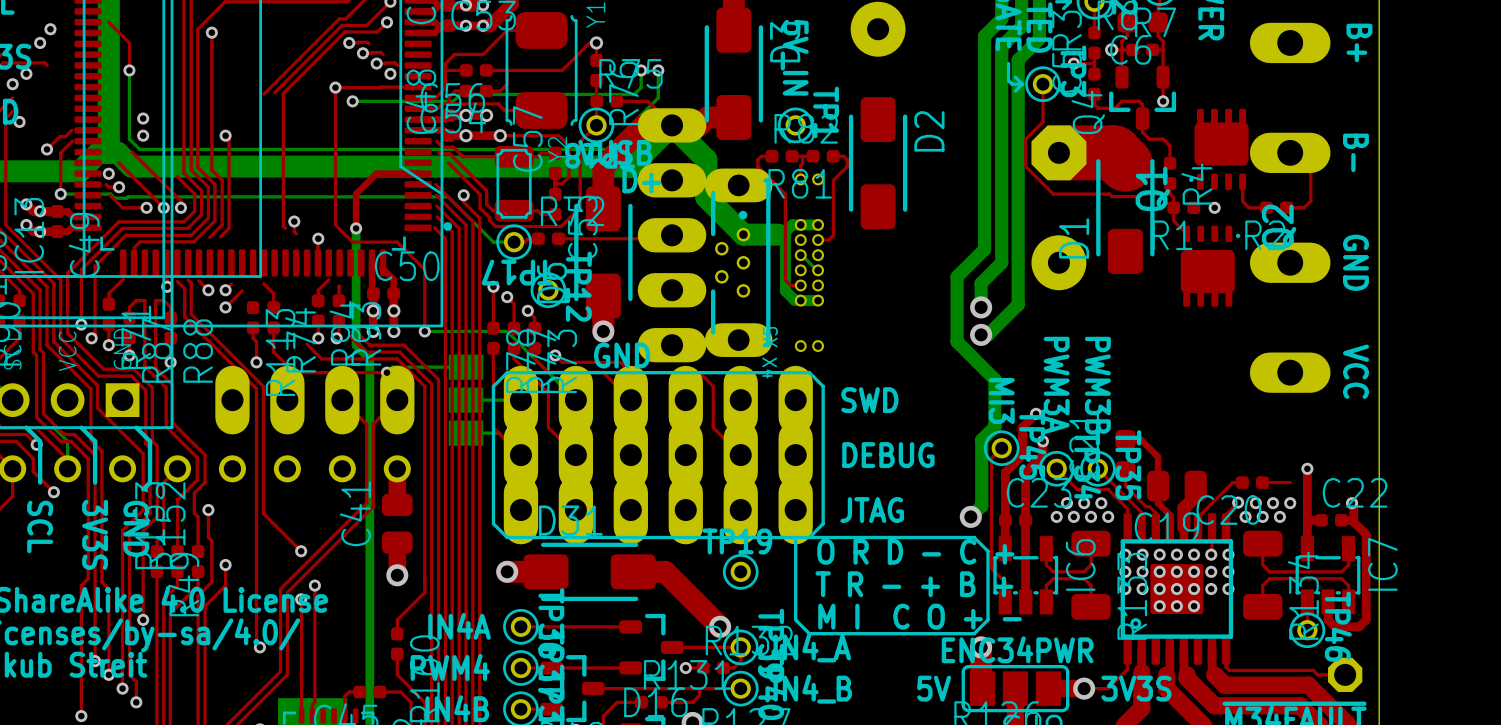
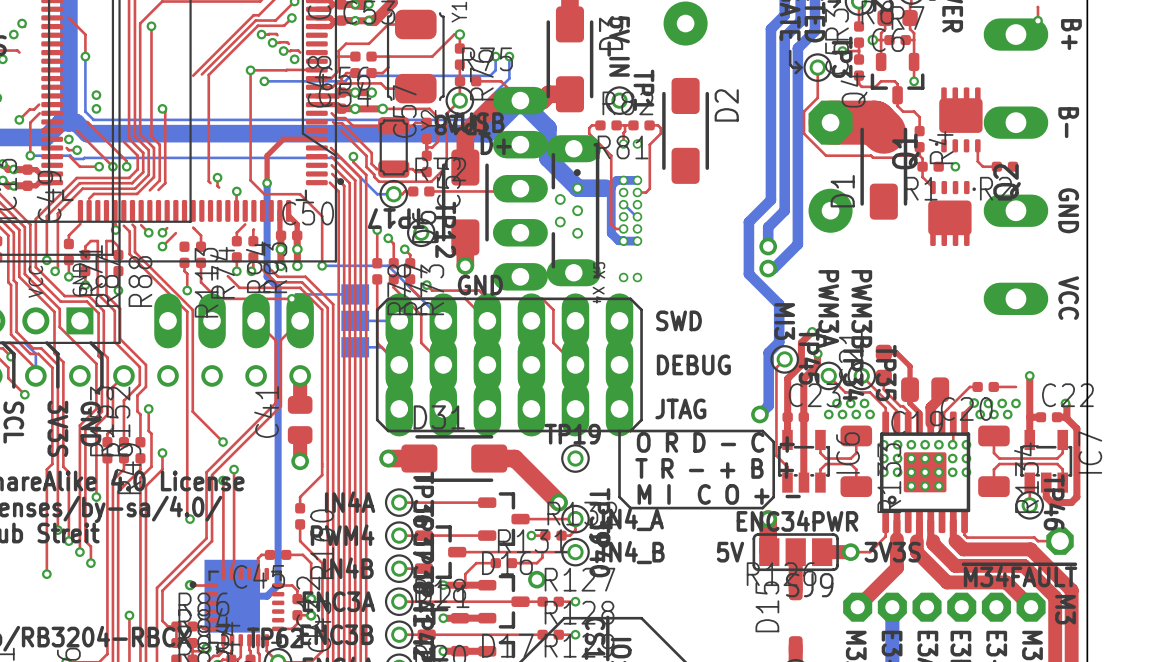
top track: none -> (1038, 7) (1038, 20)
via: none -> (1038, 20)
top track: (1290, 152) (1310, 173) (1310, 200) (1303, 207) (1286, 207) -> none

